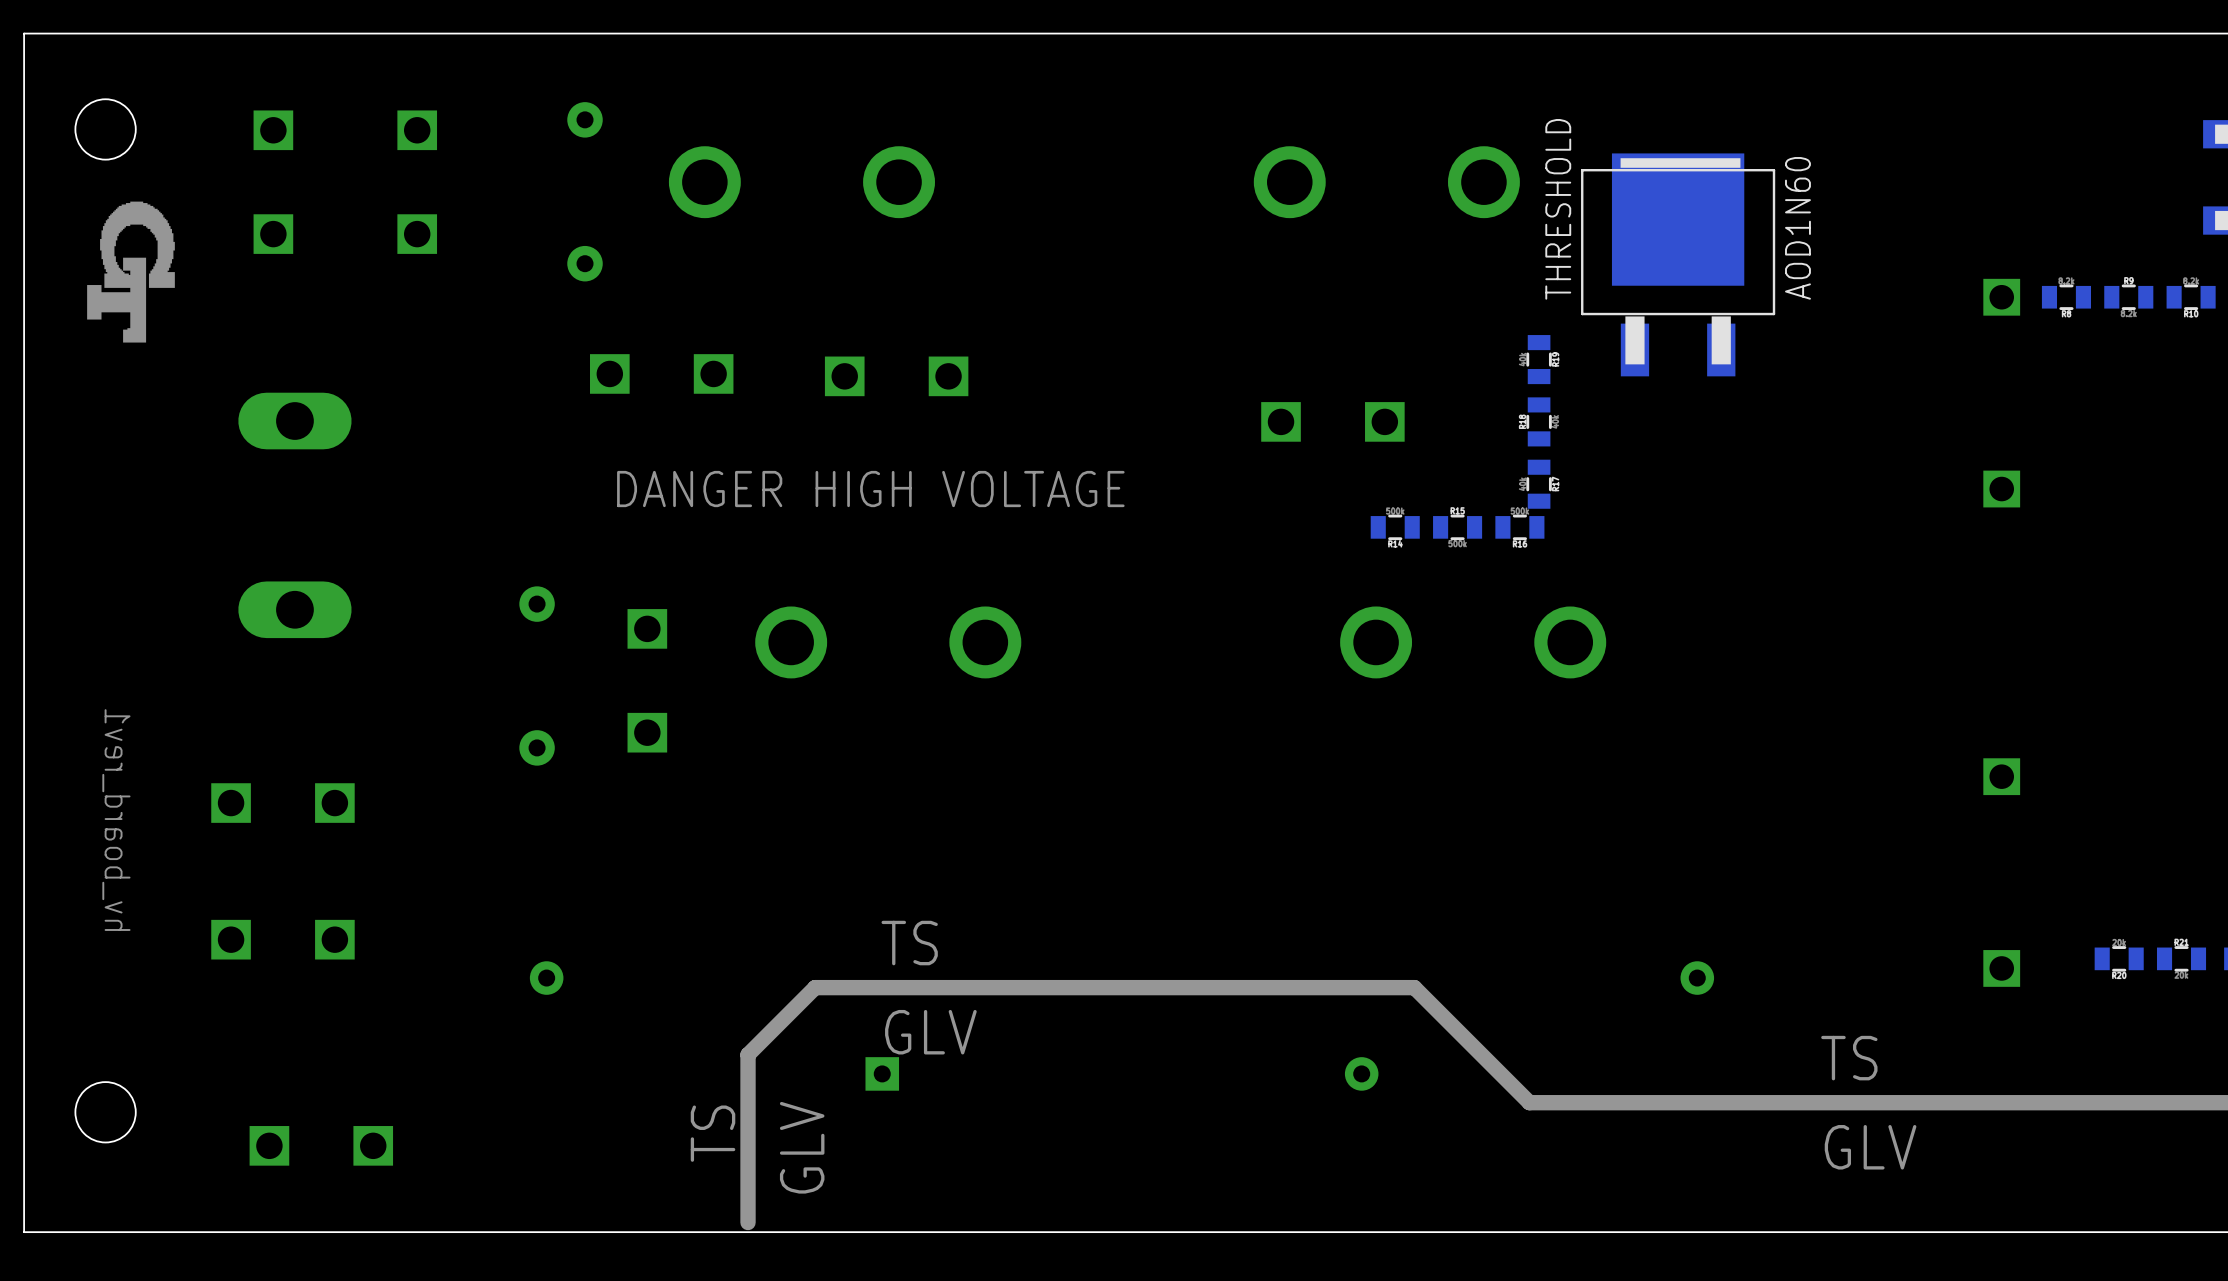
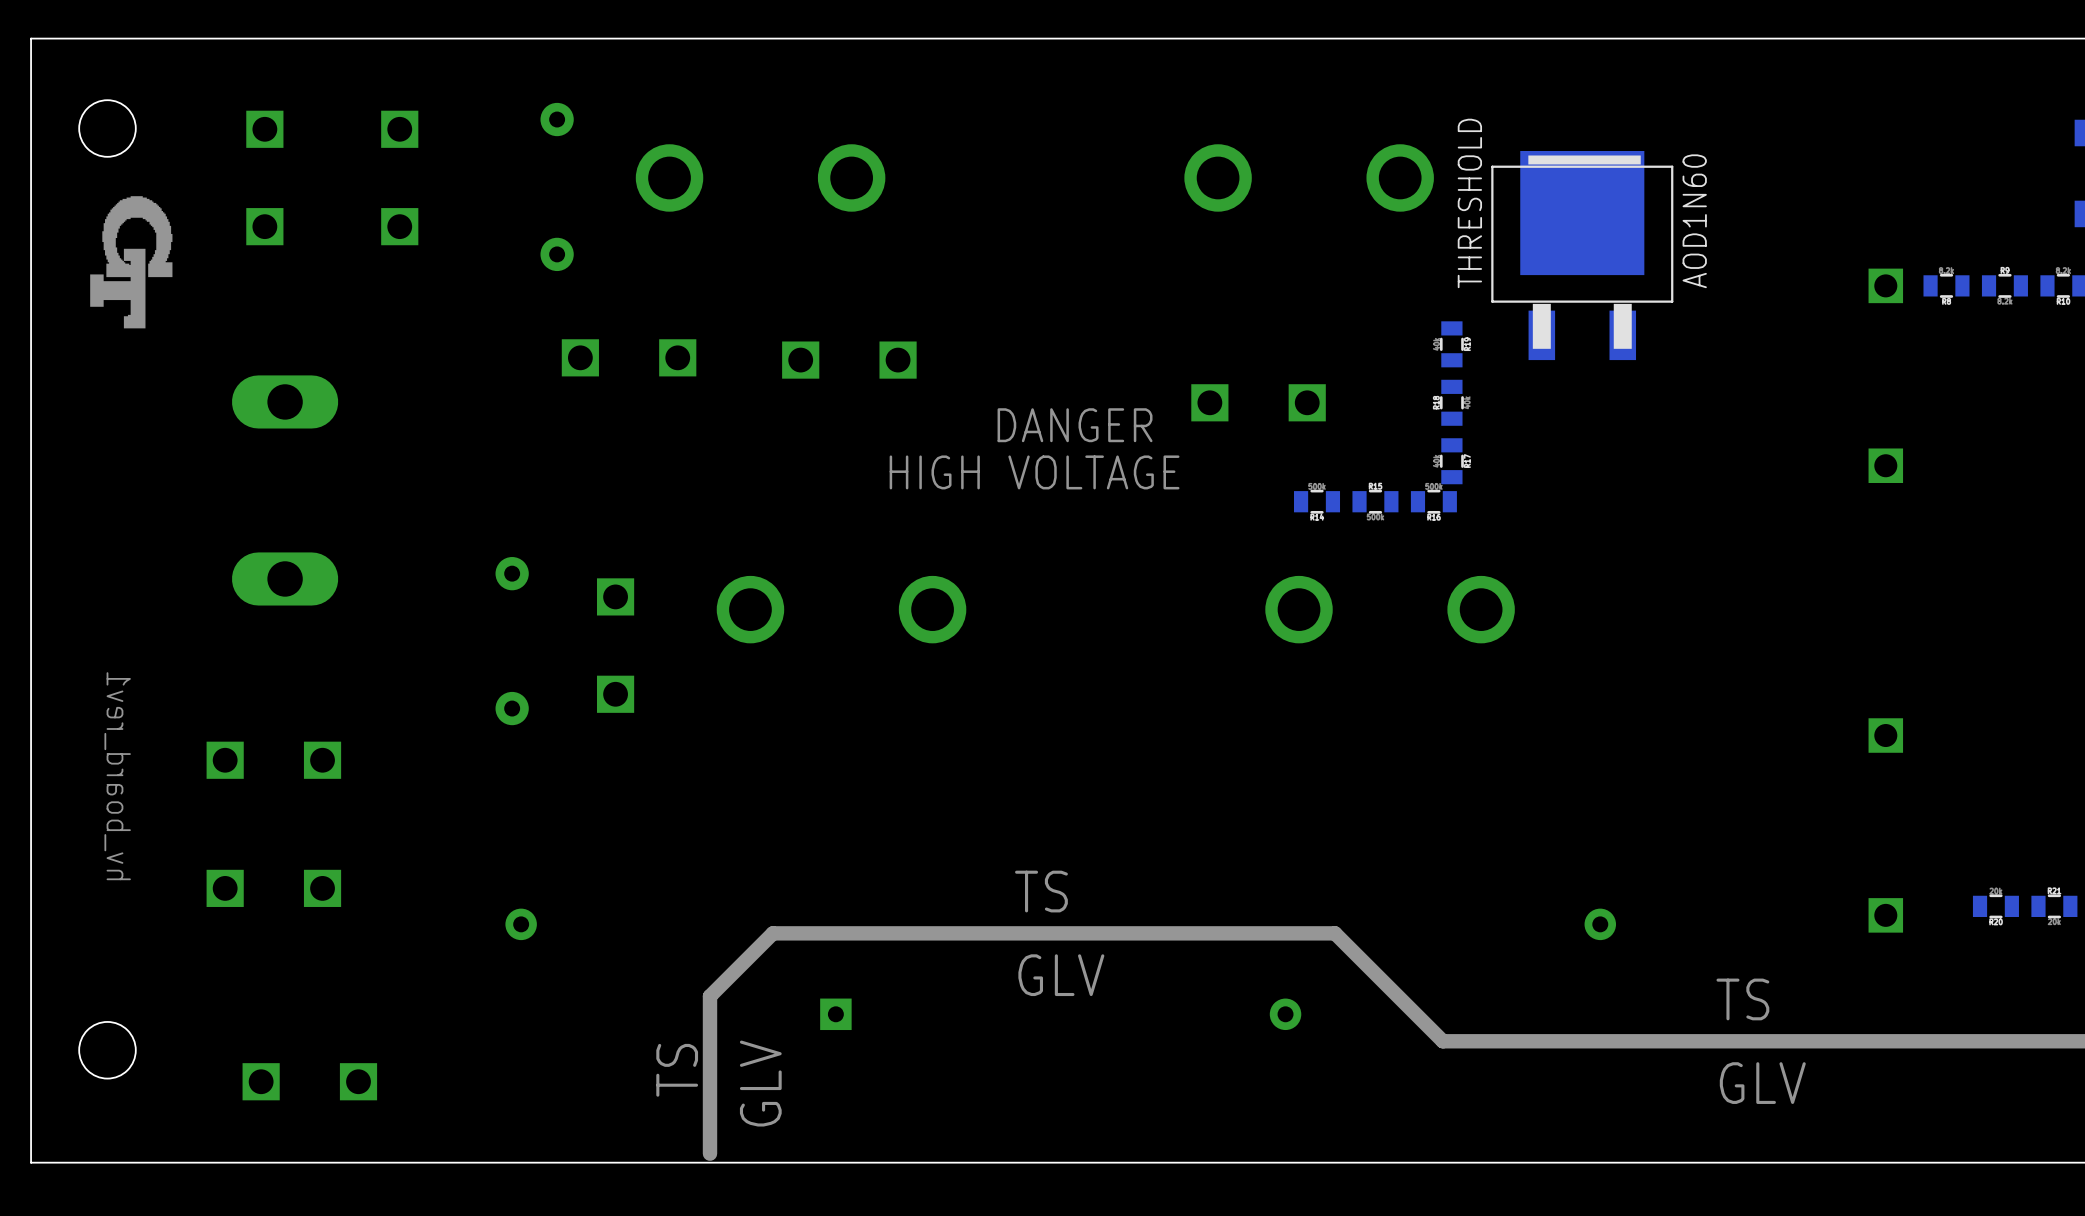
text: none -> DANGER (1075, 425)
text: DANGER HIGH VOLTAGE (870, 489) -> HIGH VOLTAGE (1034, 472)
text position: TS (909, 943) -> TS (1041, 891)
text position: GLV (930, 1032) -> GLV (1061, 975)

